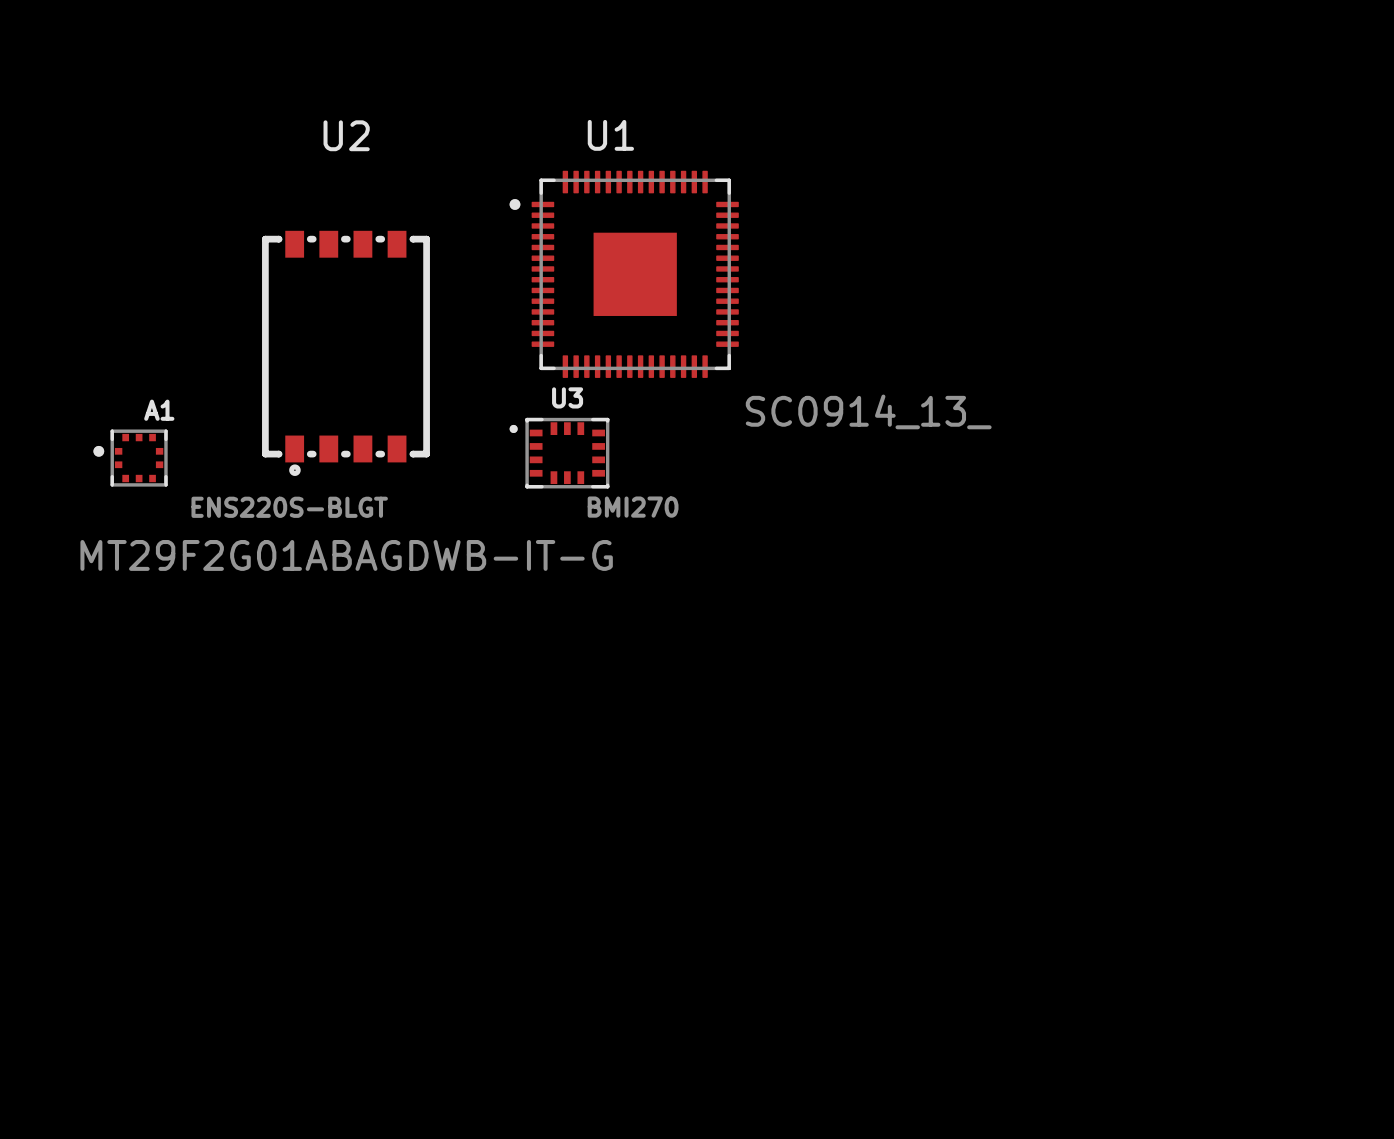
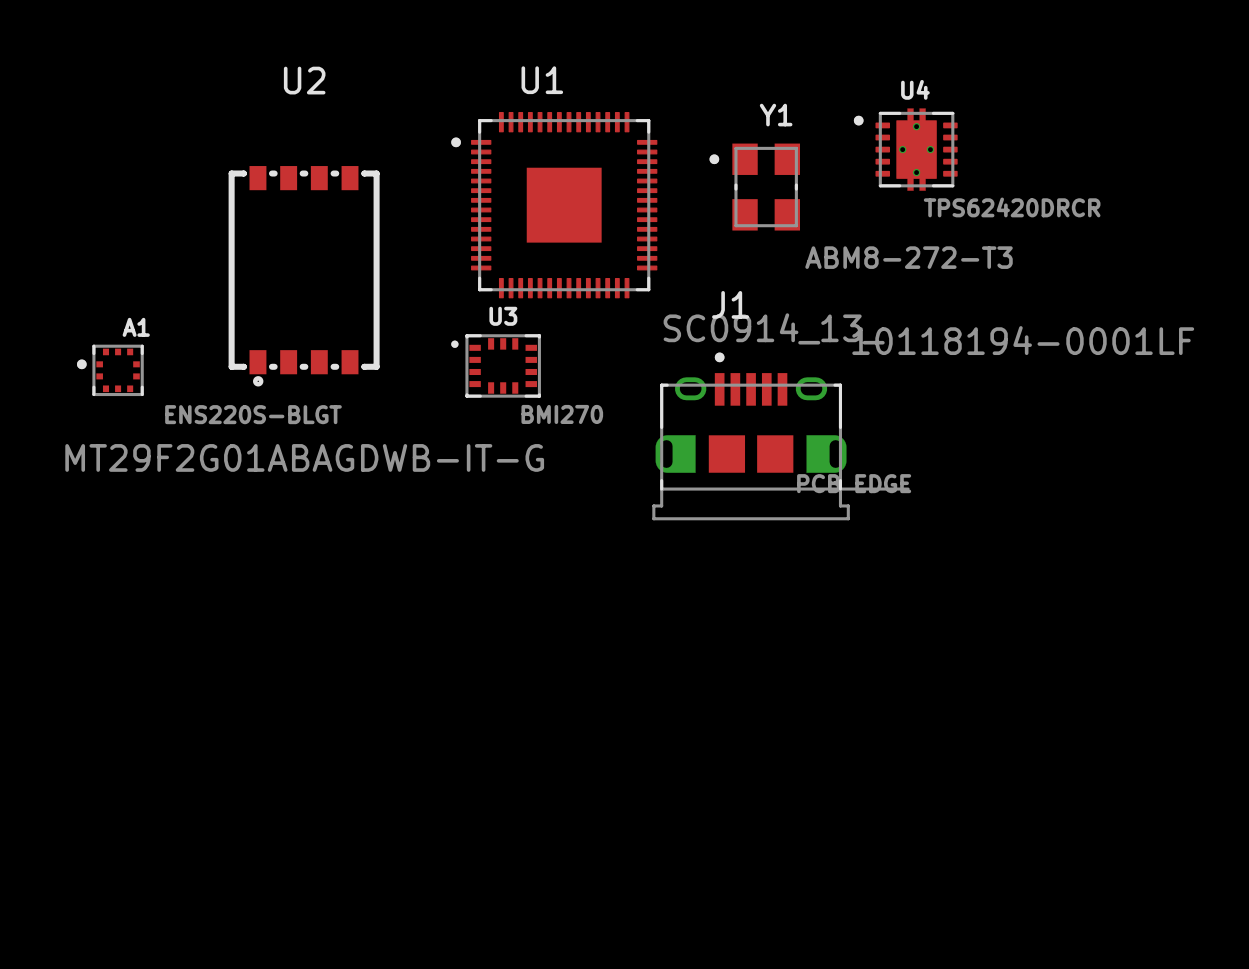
U4: none -> TPS62420DRCR (905, 149)
Y1: none -> ABM8-272-T3 (754, 187)
J1: none -> 10118194-0001LF (780, 436)

